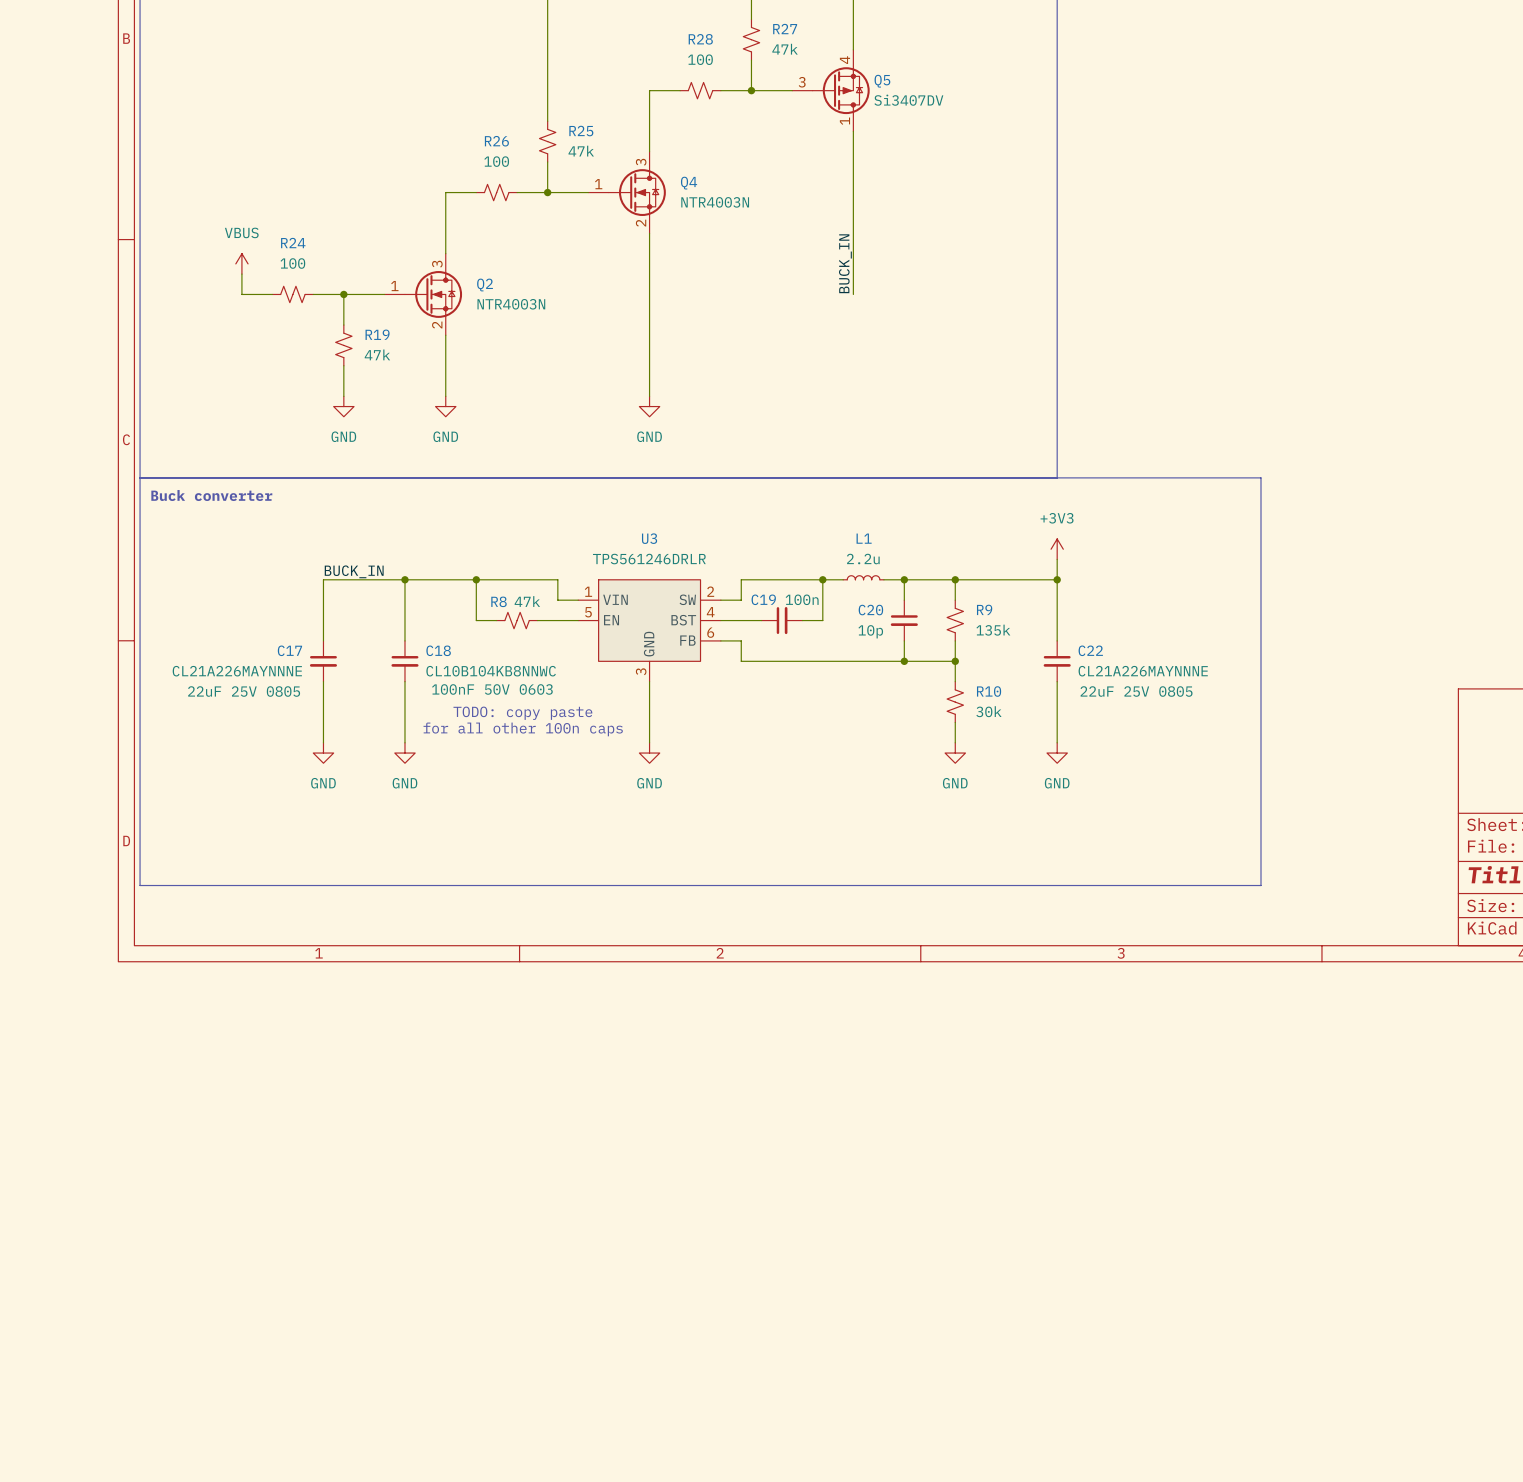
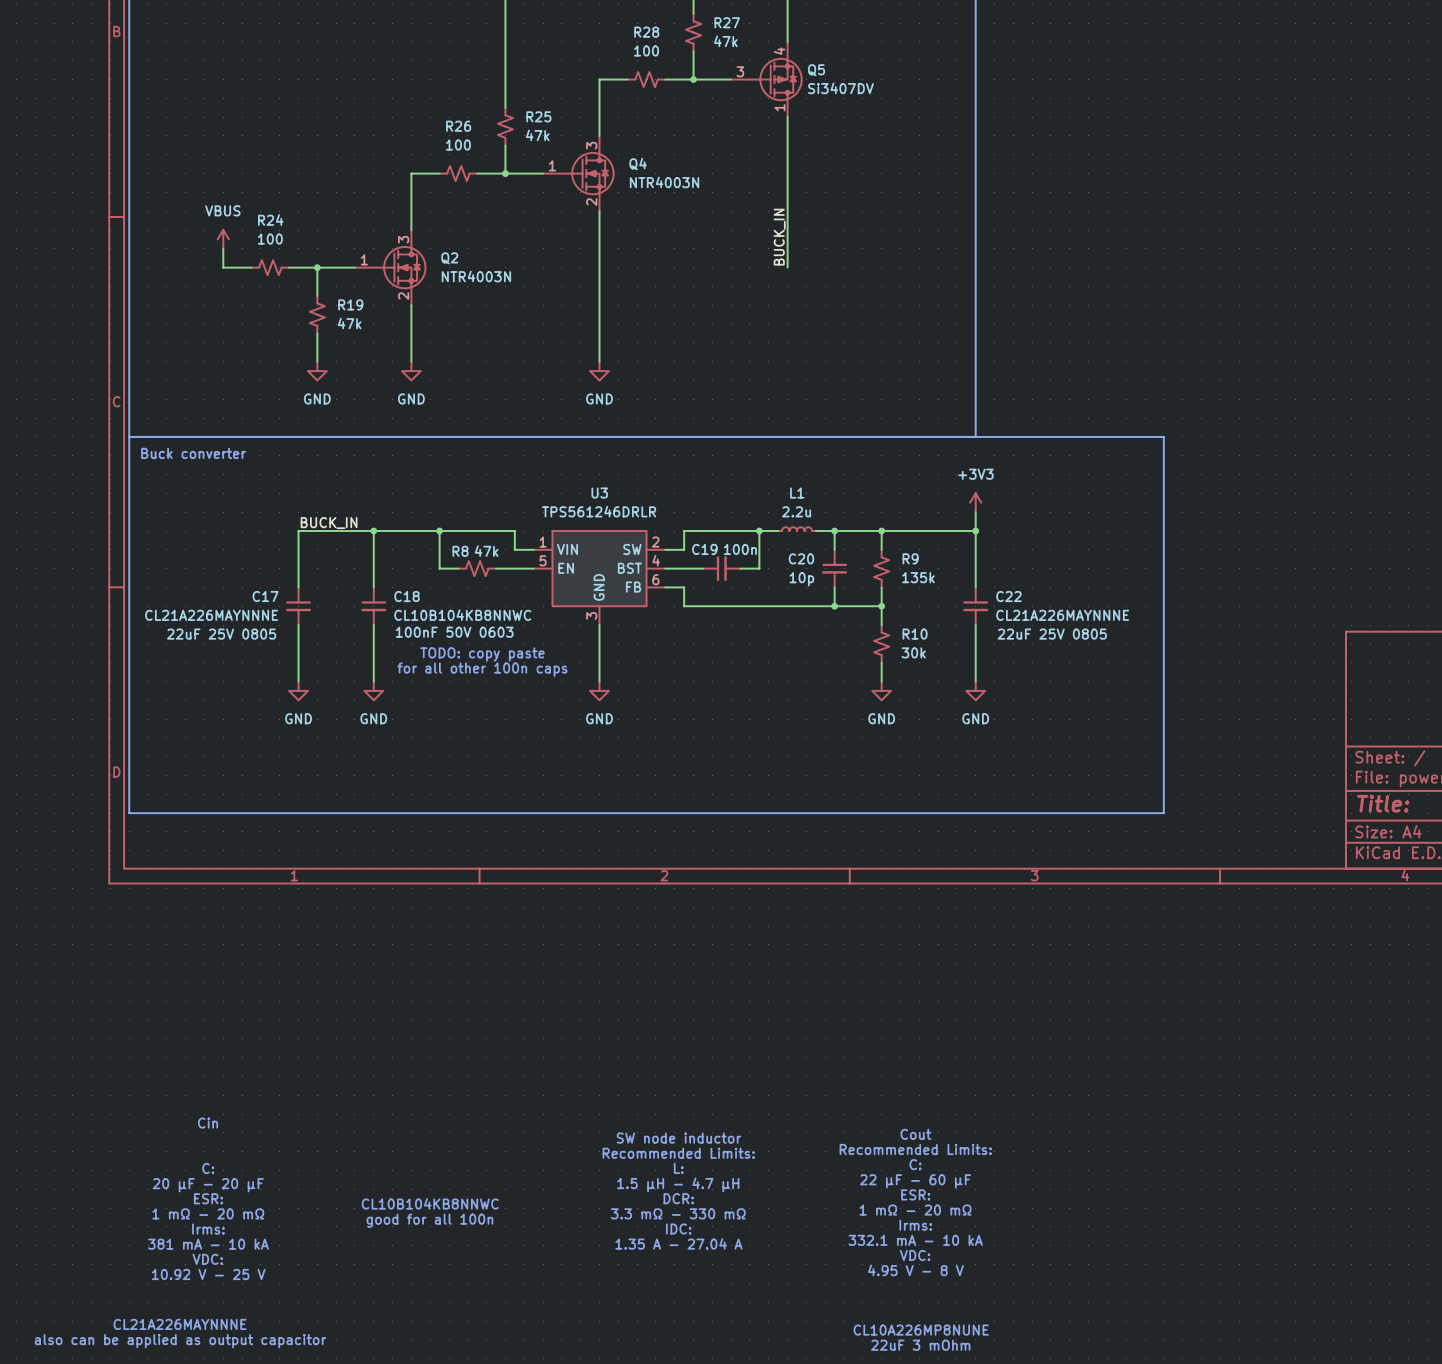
text: none -> Cin (208, 1123)
text: none -> Cout (915, 1134)
text: none -> SW node inductor (678, 1138)
text: none -> Recommended Limits: (915, 1149)
text: none -> Recommended Limits: (678, 1153)
text: none -> C: (915, 1164)
text: none -> C: (208, 1168)
text: none -> L: (678, 1168)
text: none -> 22 μF - 60 μF (915, 1181)
text: none -> 20 μF - 20 μF (208, 1185)
text: none -> 1.5 μH - 4.7 μH (678, 1184)
text: none -> ESR: (915, 1194)
text: none -> ESR: (208, 1198)
text: none -> DCR: (678, 1198)
text: none -> CL10B104KB8NNWC (430, 1203)
text: none -> 1 mΩ - 20 mΩ (915, 1210)
text: none -> 1 mΩ - 20 mΩ (208, 1213)
text: none -> 3.3 mΩ - 330 mΩ (678, 1213)
text: none -> good for all 100n (429, 1220)
text: none -> Irms: (915, 1225)
text: none -> Irms: (208, 1229)
text: none -> IDC: (678, 1228)
text: none -> 332.1 mA - 10 kA (915, 1240)
text: none -> 381 mA - 10 kA (208, 1244)
text: none -> 1.35 A - 27.04 A (678, 1243)
text: none -> VDC: (915, 1255)
text: none -> VDC: (207, 1259)
text: none -> 4.95 V - 8 V (915, 1270)
text: none -> 10.92 V - 25 V (208, 1274)
text: none -> CL21A226MAYNNNE (180, 1324)
text: none -> CL10A226MP8NUNE (921, 1330)
text: none -> also can be applied as output capacitor (180, 1341)
text: none -> 22uF 3 mOhm (920, 1345)

